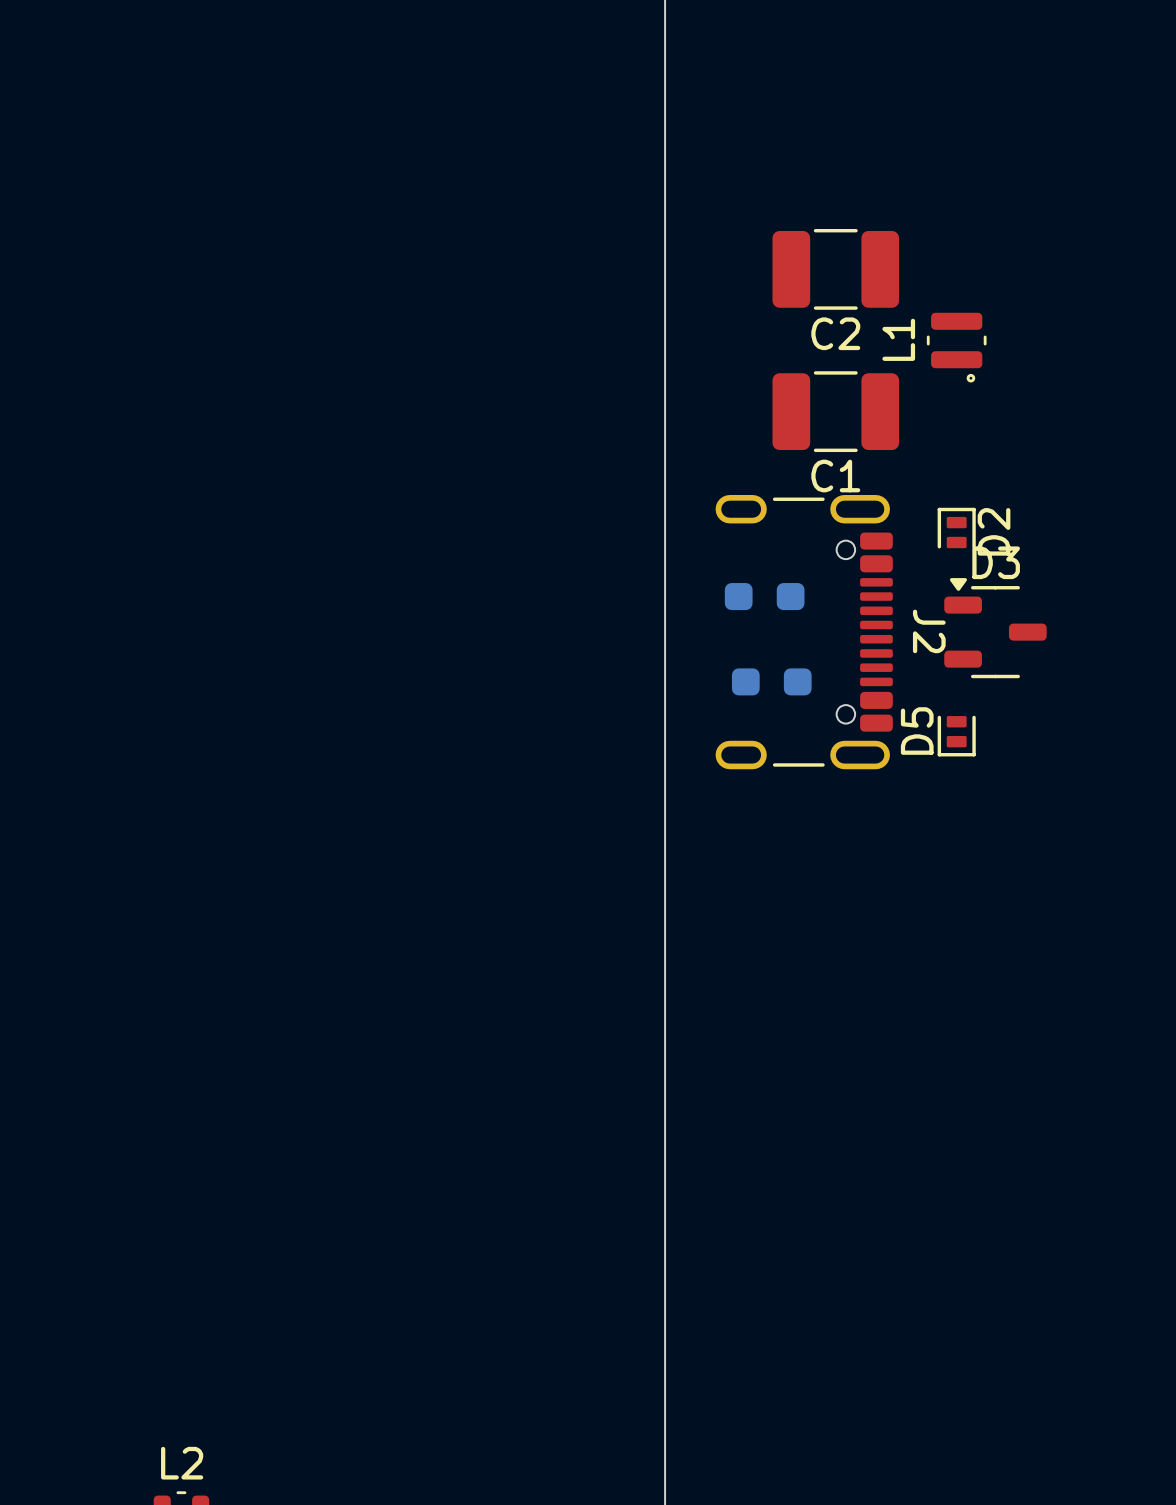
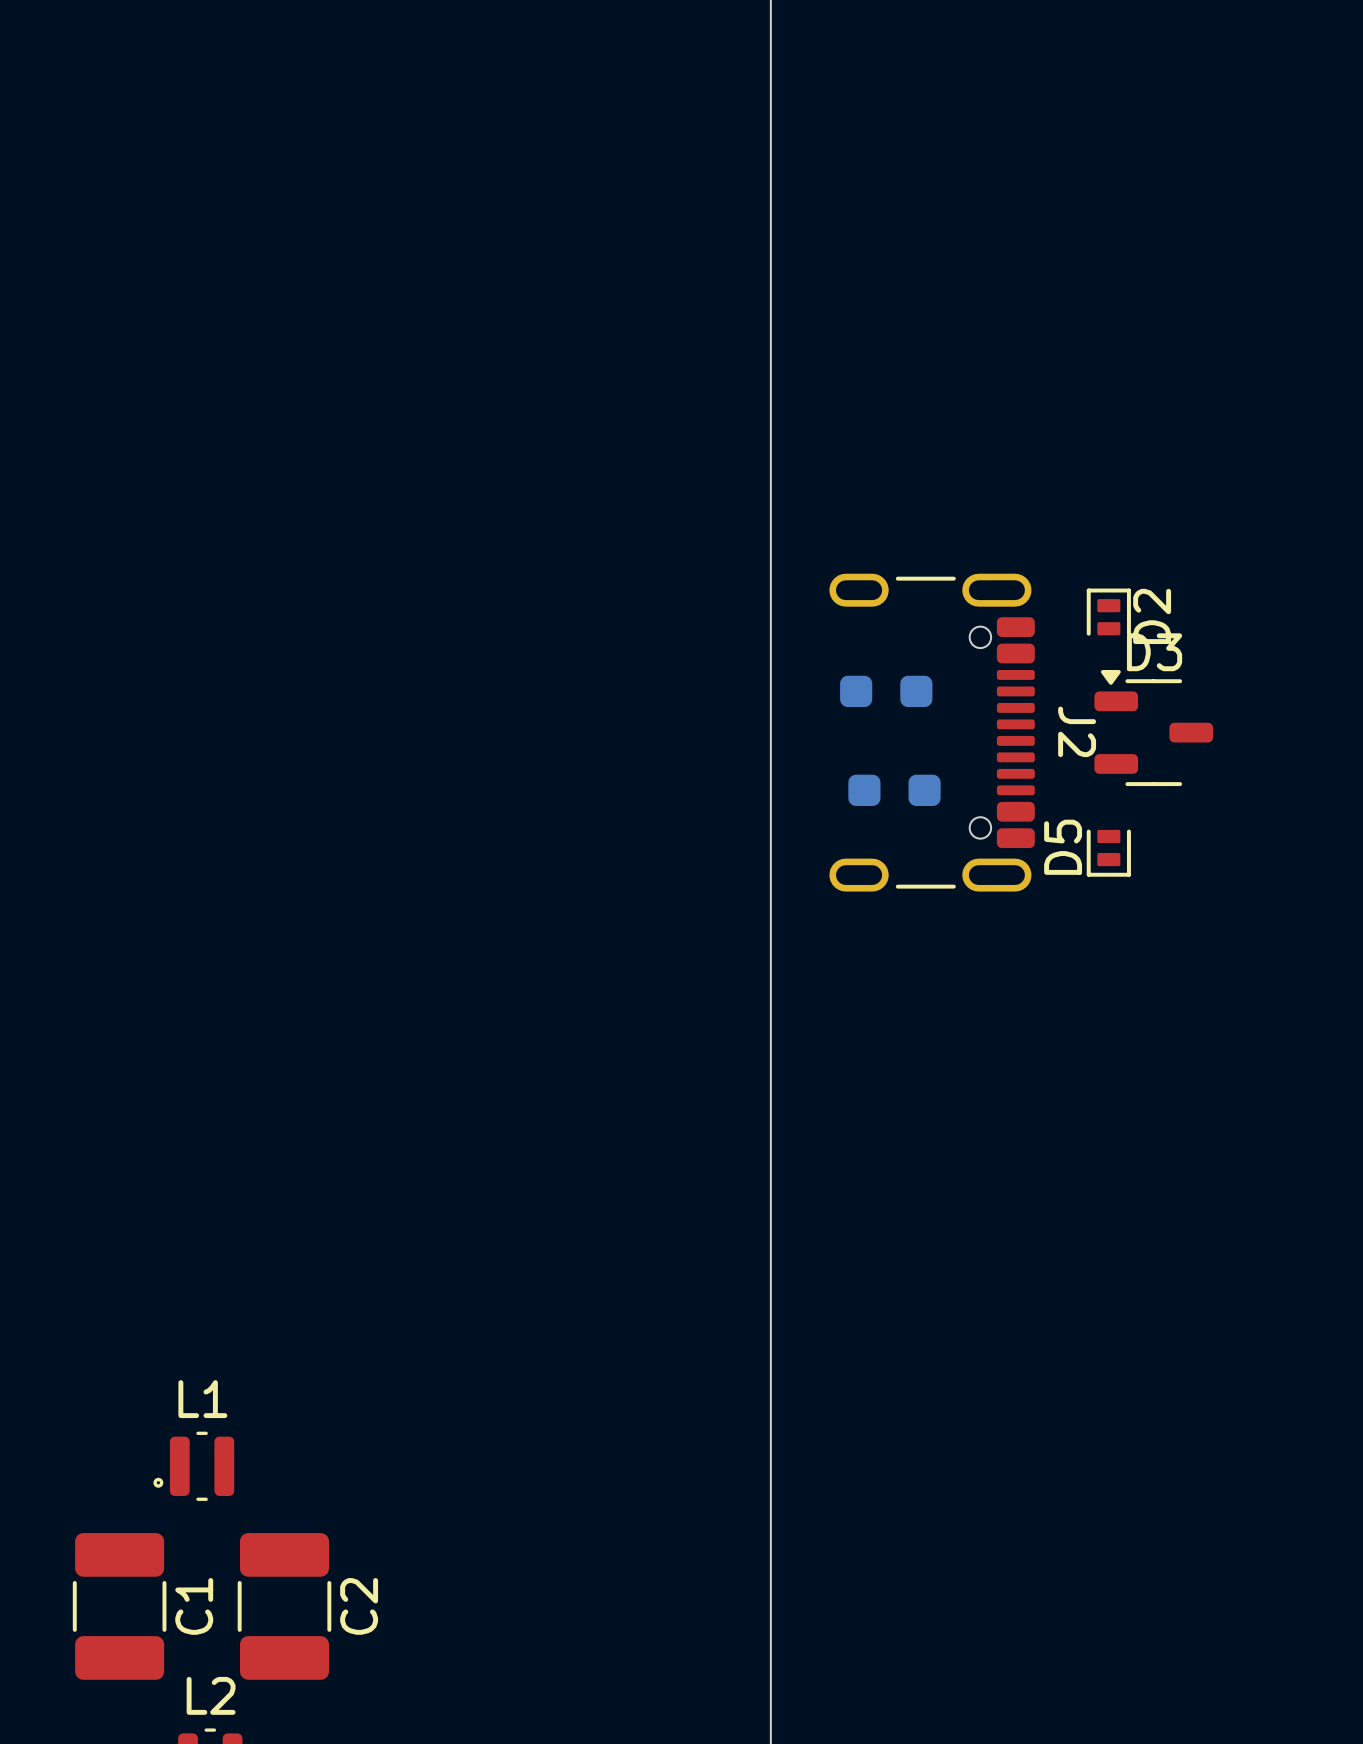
C2 rotation: 0° (835, 269) -> 90° clockwise (284, 1606)
C2 position: (835, 269) -> (284, 1606)
C2 name position: C2 (835, 333) -> C2 (359, 1606)
L1 rotation: 0° (956, 347) -> 90° clockwise (193, 1466)
L1 position: (956, 347) -> (193, 1466)
C1 rotation: 0° (835, 411) -> 90° clockwise (119, 1606)
C1 position: (835, 411) -> (119, 1606)
C1 name position: C1 (835, 476) -> C1 (194, 1606)

